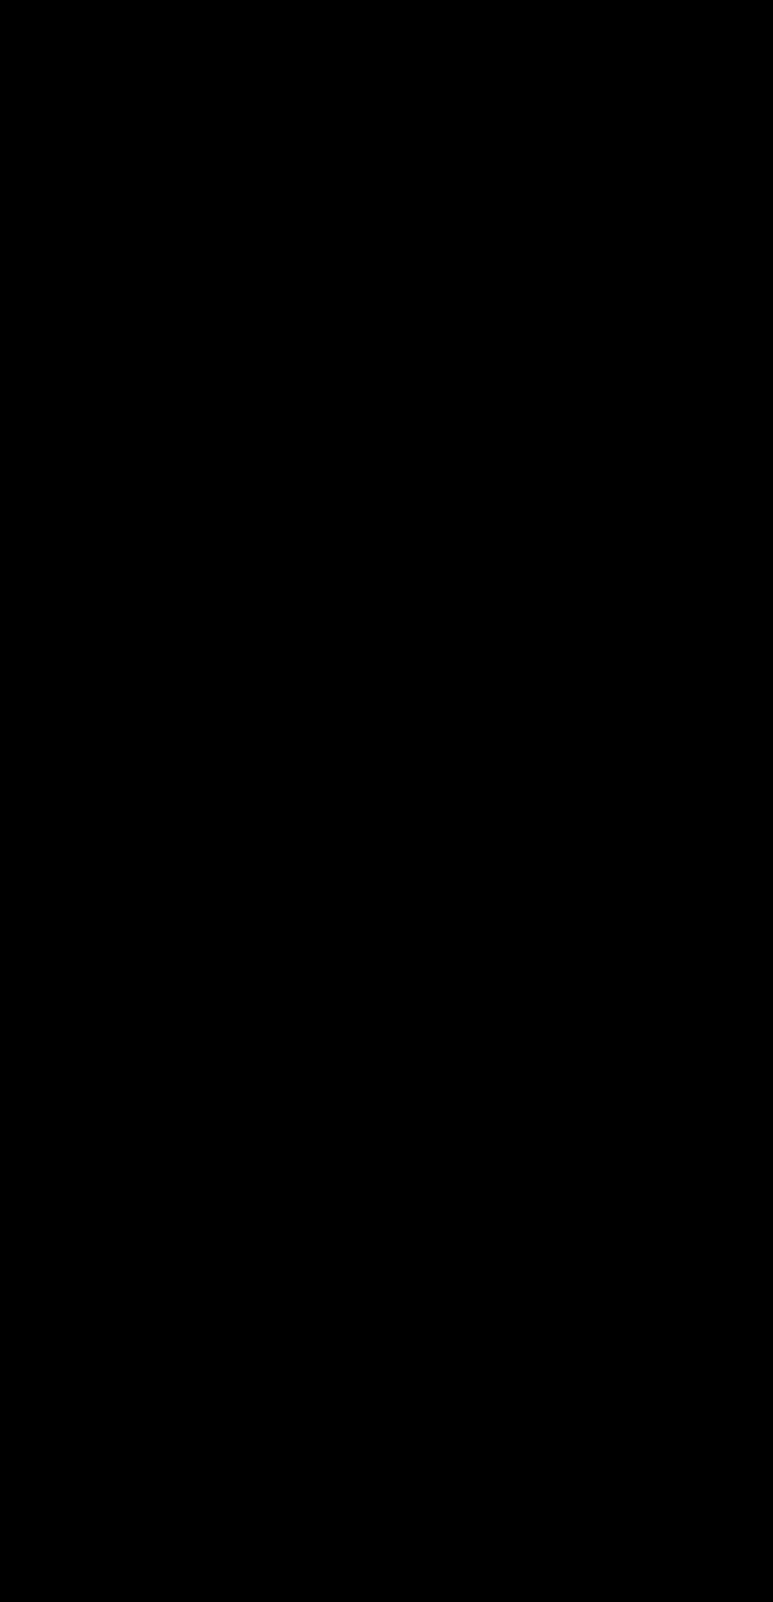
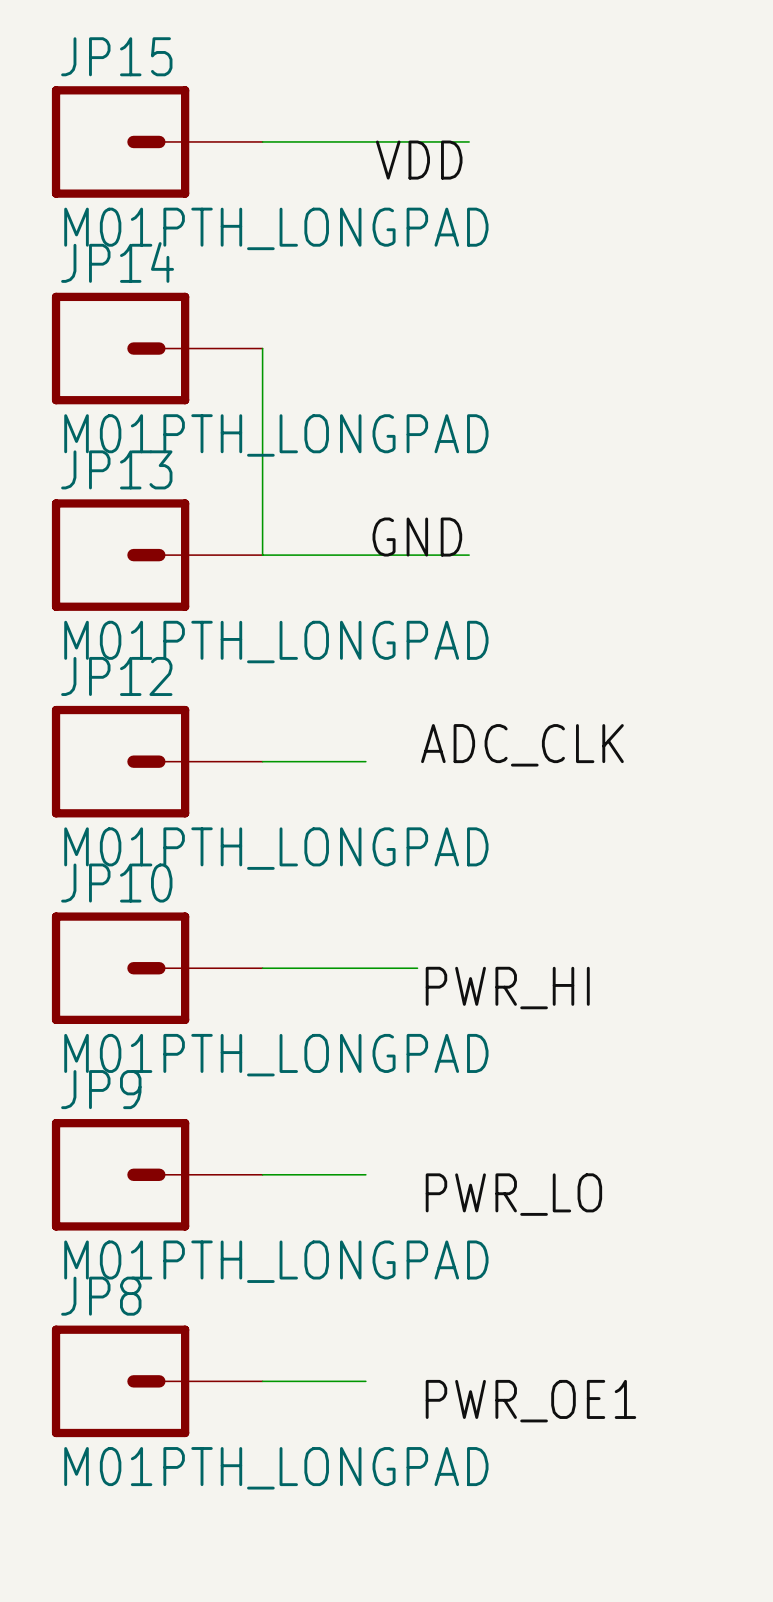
JP15: none -> M01PTH_LONGPAD (157, 141)
wire: none -> (262, 141) (469, 141)
label: none -> VDD (419, 160)
JP14: none -> M01PTH_LONGPAD (157, 348)
wire: none -> (262, 348) (262, 555) (469, 555)
label: none -> GND (417, 537)
JP13: none -> M01PTH_LONGPAD (157, 555)
label: none -> ADC_CLK (522, 745)
JP12: none -> M01PTH_LONGPAD (157, 761)
wire: none -> (262, 761) (365, 761)
JP10: none -> M01PTH_LONGPAD (157, 968)
wire: none -> (262, 968) (417, 968)
label: none -> PWR_HI (507, 988)
JP9: none -> M01PTH_LONGPAD (157, 1174)
wire: none -> (262, 1174) (365, 1174)
label: none -> PWR_LO (513, 1194)
JP8: none -> M01PTH_LONGPAD (157, 1381)
wire: none -> (262, 1381) (365, 1381)
label: none -> PWR_OE1 (530, 1401)

